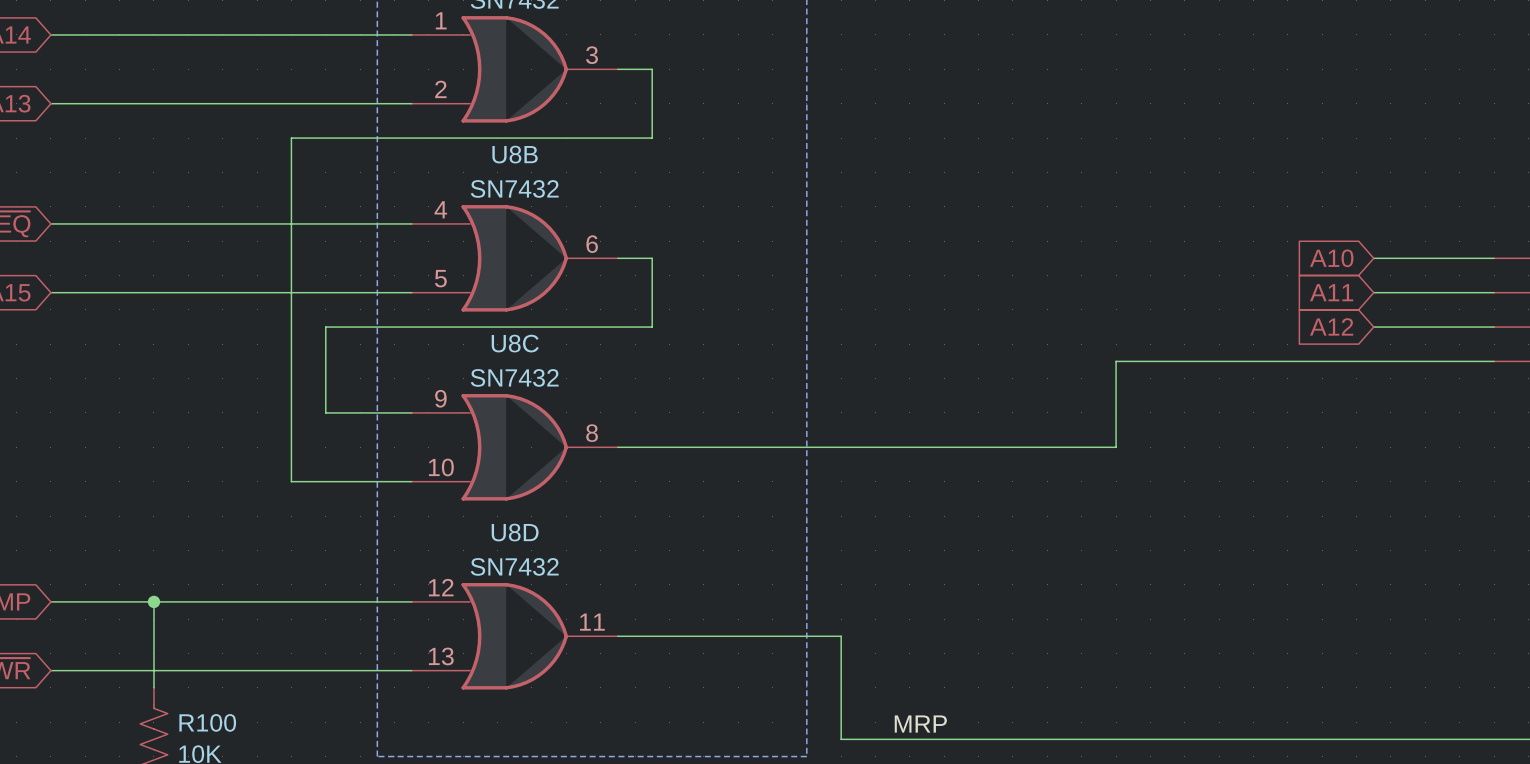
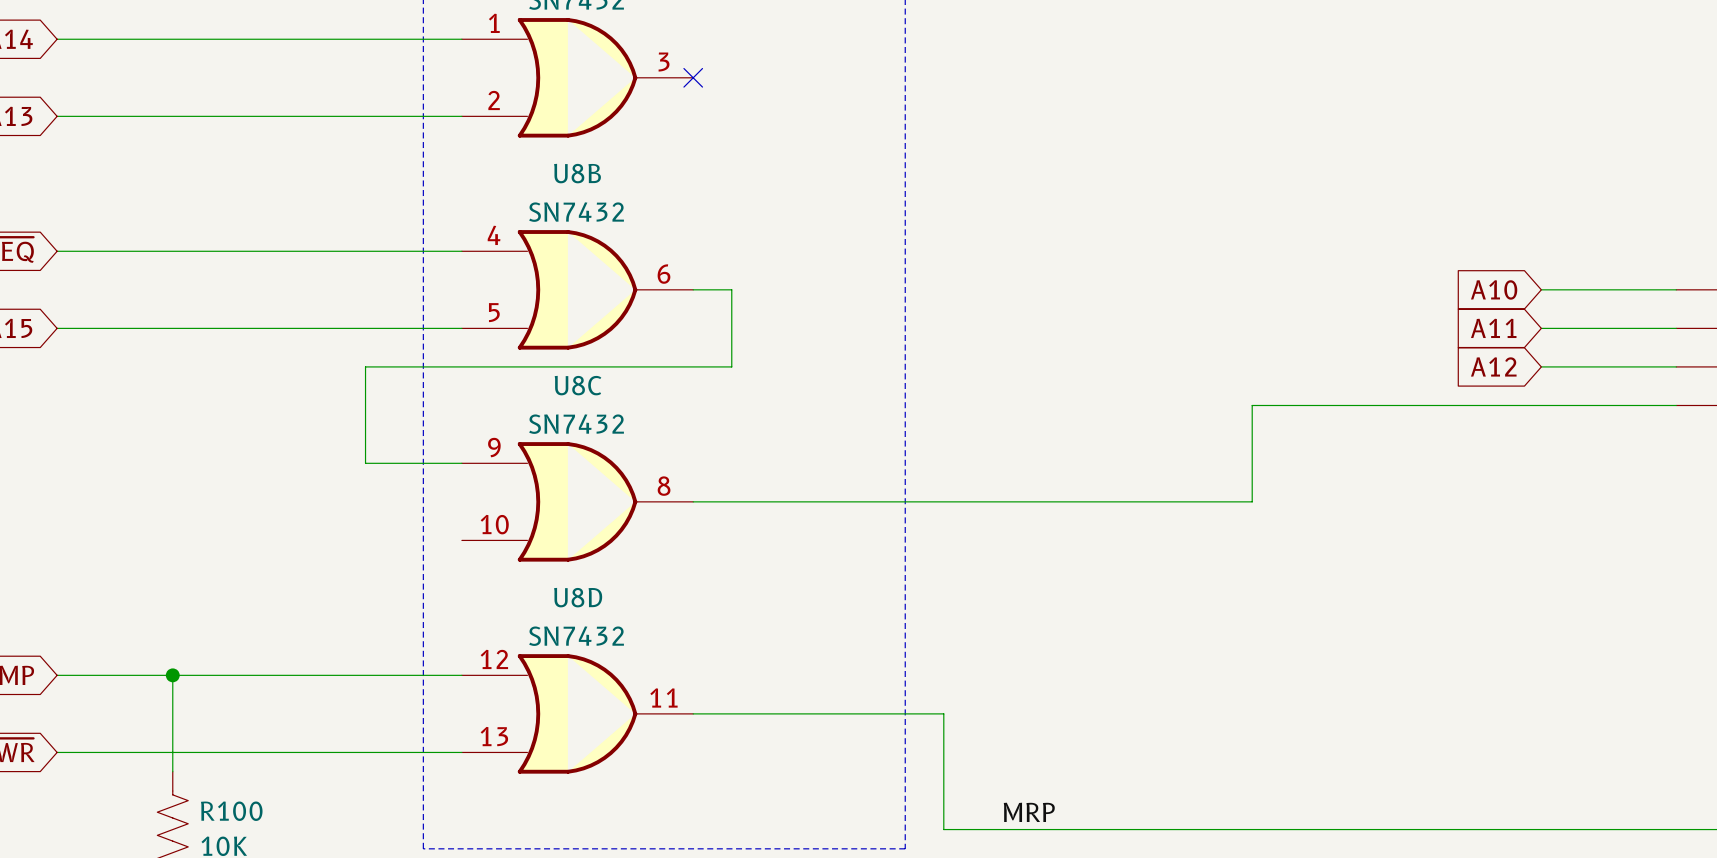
wire: (617, 69) (652, 69) (652, 138) (291, 138) (291, 481) (411, 481) -> none
no-connect mark: none -> (693, 77)

